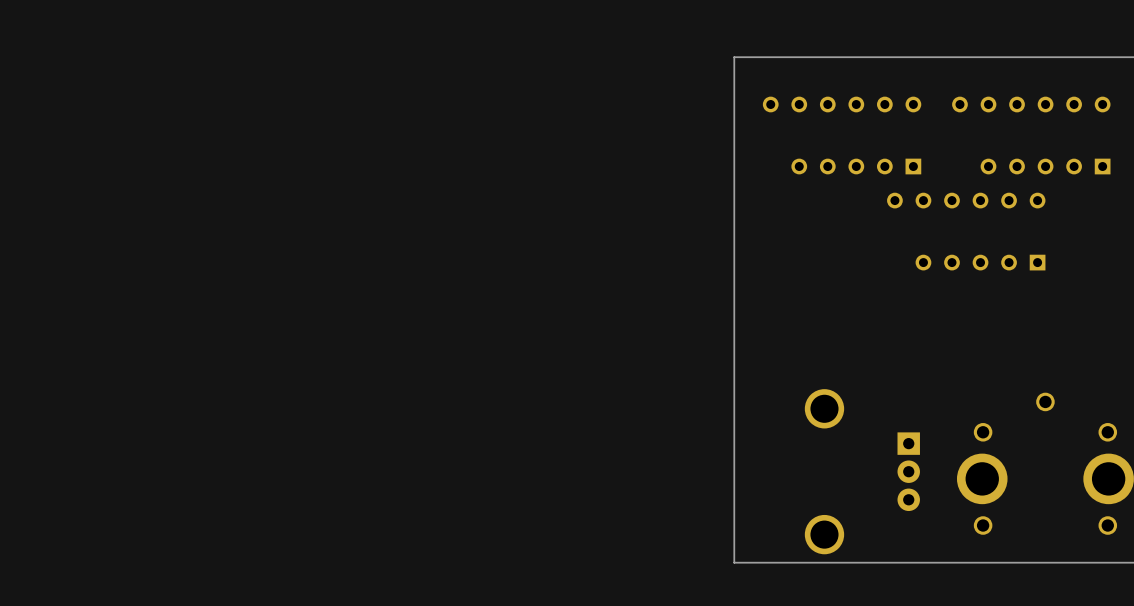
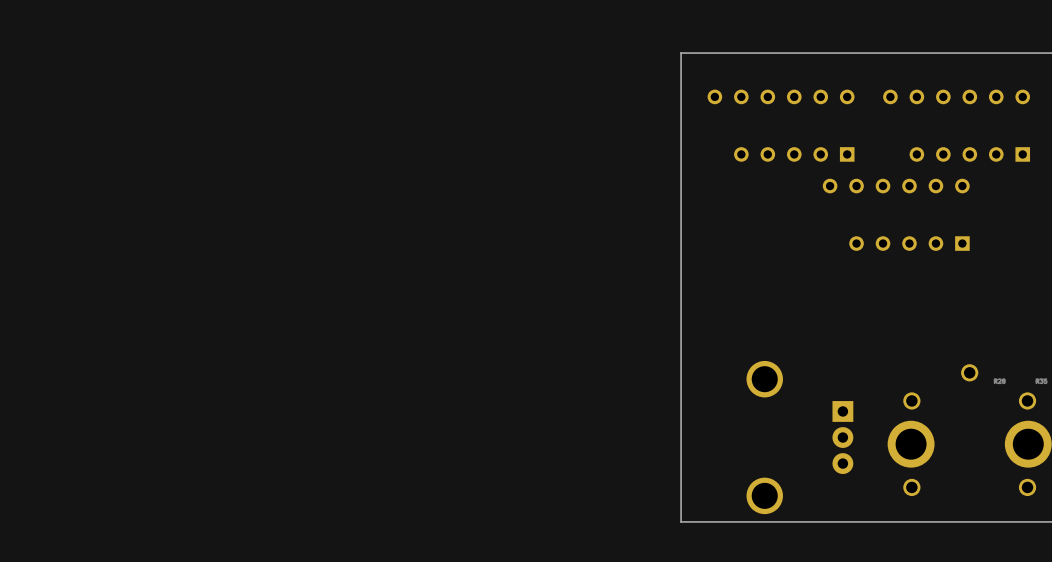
part: none -> (999, 381)
part: none -> (1041, 381)

